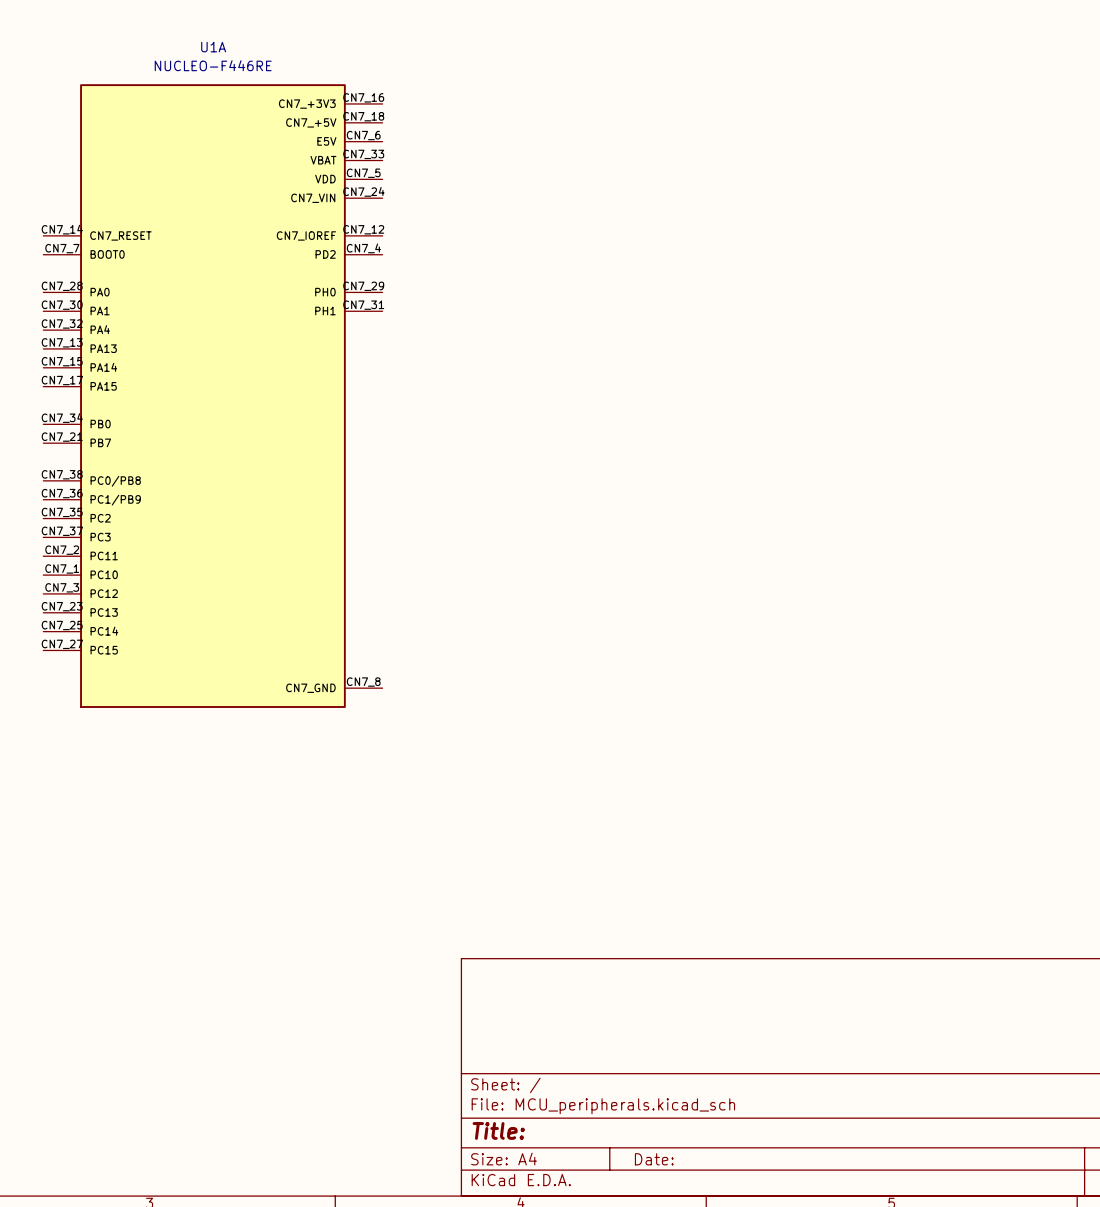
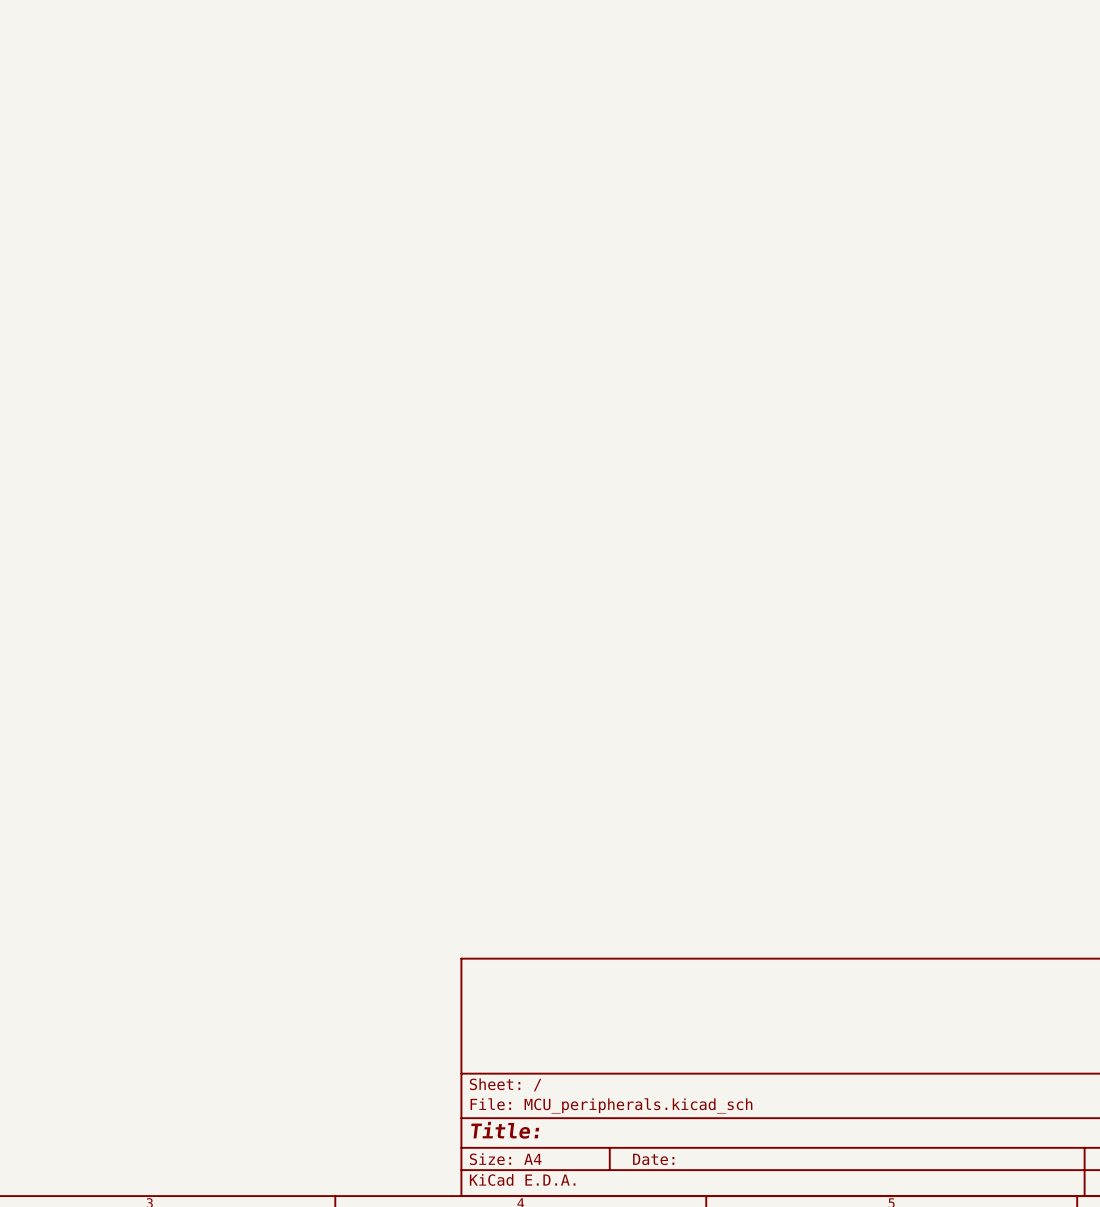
U1A: NUCLEO-F446RE (212, 396) -> none

